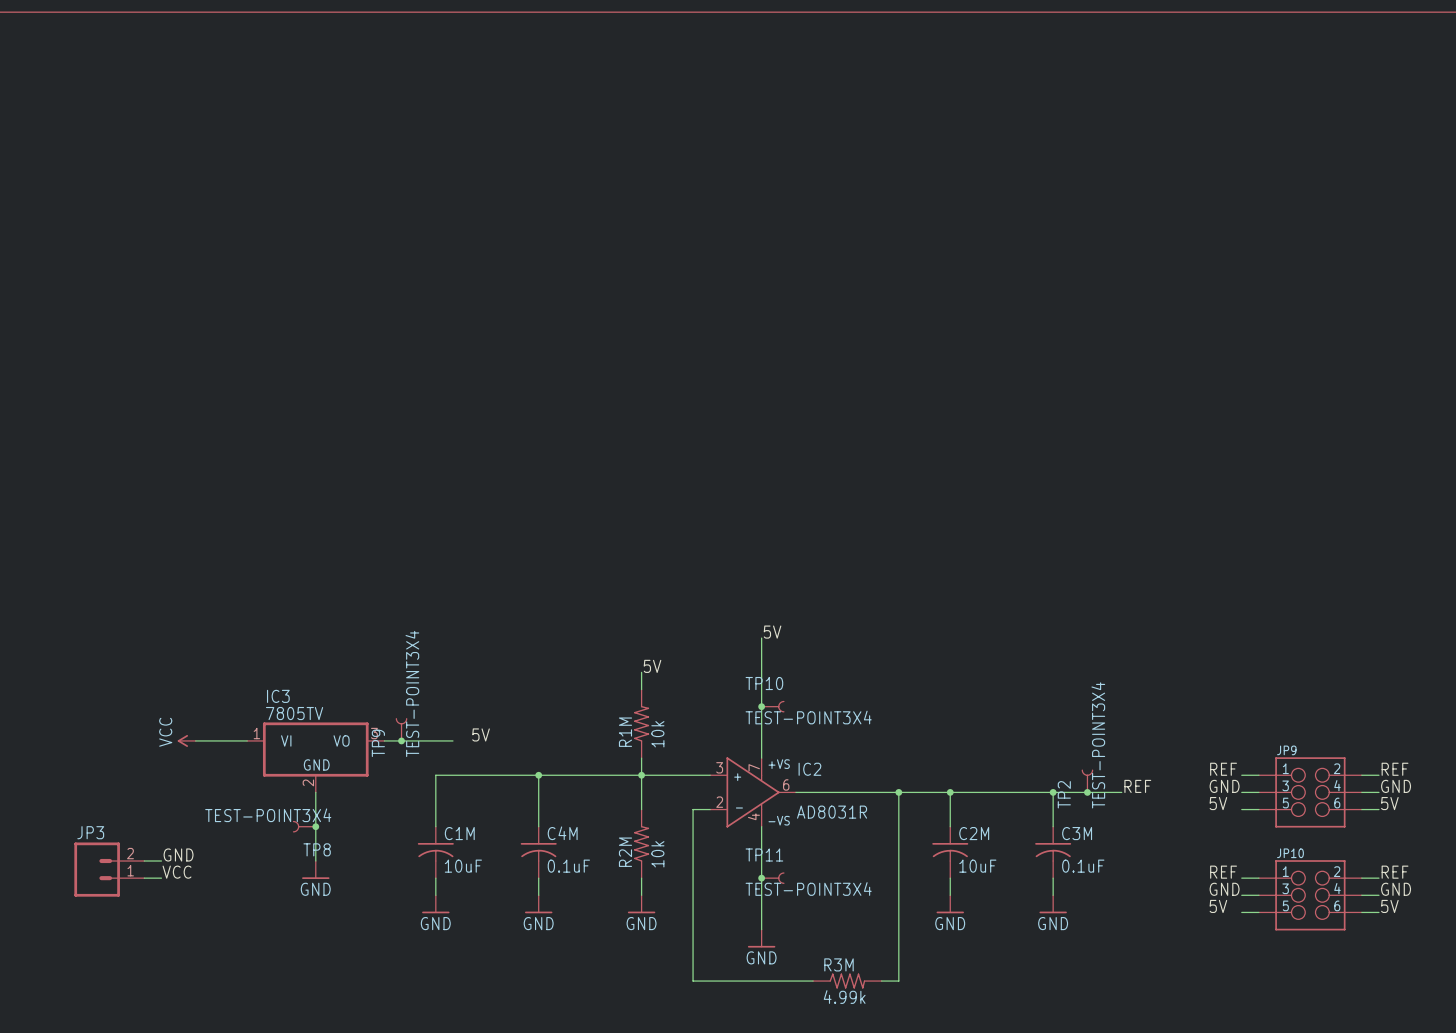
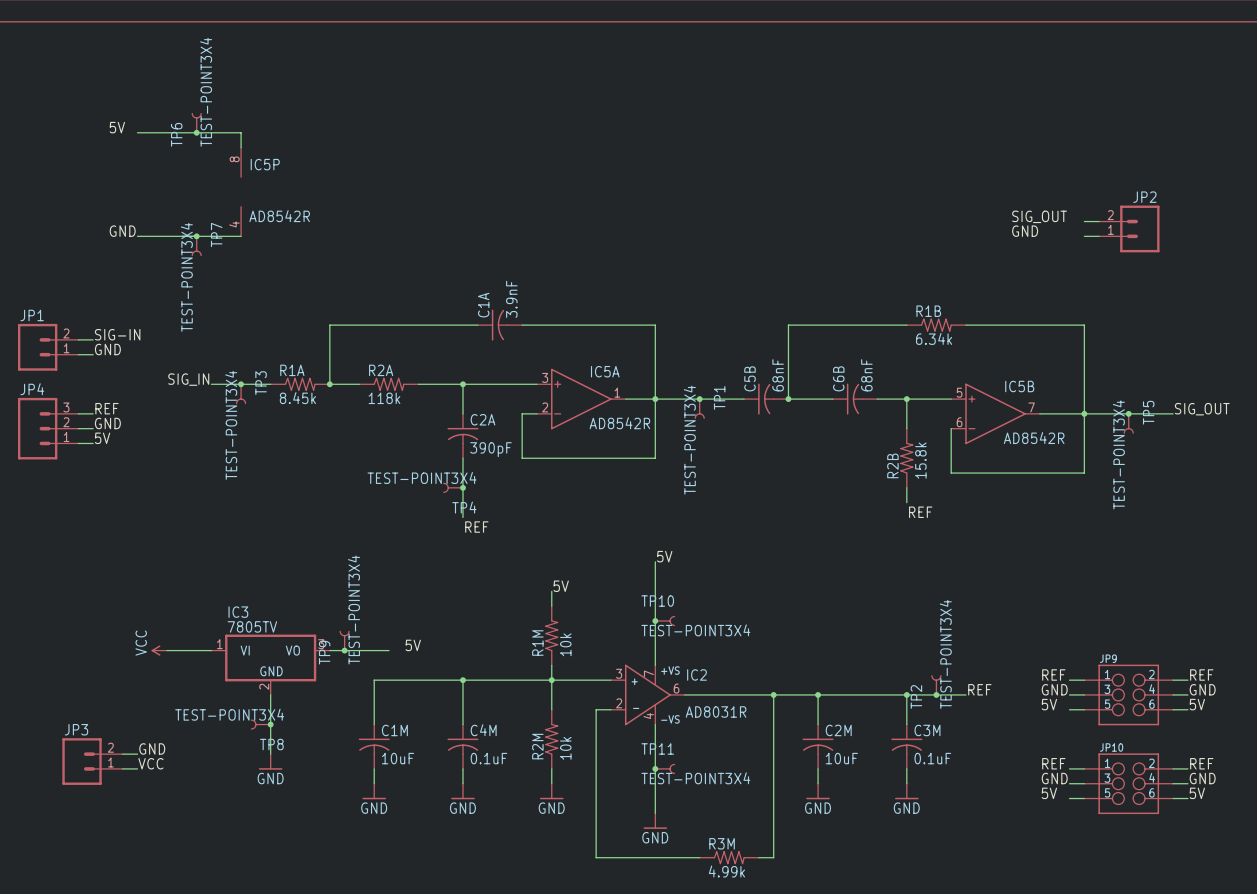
TP6: none -> TEST-POINT3X4 (196, 123)
label: none -> 5V (117, 127)
wire: none -> (137, 132) (241, 132) (241, 147)
junction: none -> (196, 132)
IC5P: none -> AD8542R (241, 191)
label: none -> SIG_OUT (1039, 216)
wire: none -> (1084, 221) (1099, 221)
JP2: none -> (1129, 228)
label: none -> GND (122, 231)
label: none -> GND (1025, 231)
wire: none -> (137, 236) (241, 236)
junction: none -> (196, 236)
wire: none -> (1084, 236) (1099, 236)
TP7: none -> TEST-POINT3X4 (196, 245)
wire: none -> (477, 325) (329, 325) (329, 384) (359, 384)
C1A: none -> 3.9nF (499, 325)
wire: none -> (522, 325) (655, 325) (655, 458) (522, 458) (522, 413) (536, 413)
wire: none -> (906, 325) (788, 325) (788, 399) (832, 399)
R1B: none -> 6.34k (936, 325)
wire: none -> (966, 325) (1084, 325) (1084, 473) (951, 473) (951, 428)
label: none -> SIG-IN (117, 334)
wire: none -> (78, 339) (93, 339)
JP1: none -> (48, 347)
label: none -> GND (107, 349)
wire: none -> (78, 354) (93, 354)
label: none -> SIG_IN (188, 379)
wire: none -> (211, 384) (270, 384)
junction: none -> (241, 384)
R1A: none -> 8.45k (300, 384)
junction: none -> (329, 384)
R2A: none -> 118k (389, 384)
wire: none -> (418, 384) (536, 384)
wire: none -> (462, 384) (462, 413)
junction: none -> (462, 384)
TP3: none -> TEST-POINT3X4 (241, 393)
IC5A: none -> AD8542R (581, 399)
wire: none -> (625, 399) (744, 399)
junction: none -> (655, 399)
junction: none -> (699, 399)
C5B: none -> 68nF (766, 399)
junction: none -> (788, 399)
C6B: none -> 68nF (855, 399)
wire: none -> (877, 399) (951, 399)
wire: none -> (906, 399) (906, 428)
junction: none -> (906, 399)
label: none -> REF (106, 408)
TP1: none -> TEST-POINT3X4 (699, 408)
label: none -> SIG_OUT (1202, 409)
wire: none -> (78, 413) (93, 413)
IC5B: none -> AD8542R (995, 413)
wire: none -> (1039, 413) (1173, 413)
junction: none -> (1084, 413)
junction: none -> (1128, 413)
label: none -> GND (107, 423)
TP5: none -> TEST-POINT3X4 (1128, 423)
JP4: none -> (48, 428)
wire: none -> (78, 428) (93, 428)
C2A: none -> 390pF (462, 436)
label: none -> 5V (102, 438)
wire: none -> (78, 443) (93, 443)
wire: none -> (462, 458) (462, 517)
R2B: none -> 15.8k (906, 458)
TP4: none -> TEST-POINT3X4 (453, 487)
junction: none -> (462, 487)
wire: none -> (906, 487) (906, 502)
label: none -> REF (920, 512)
label: none -> REF (476, 527)

